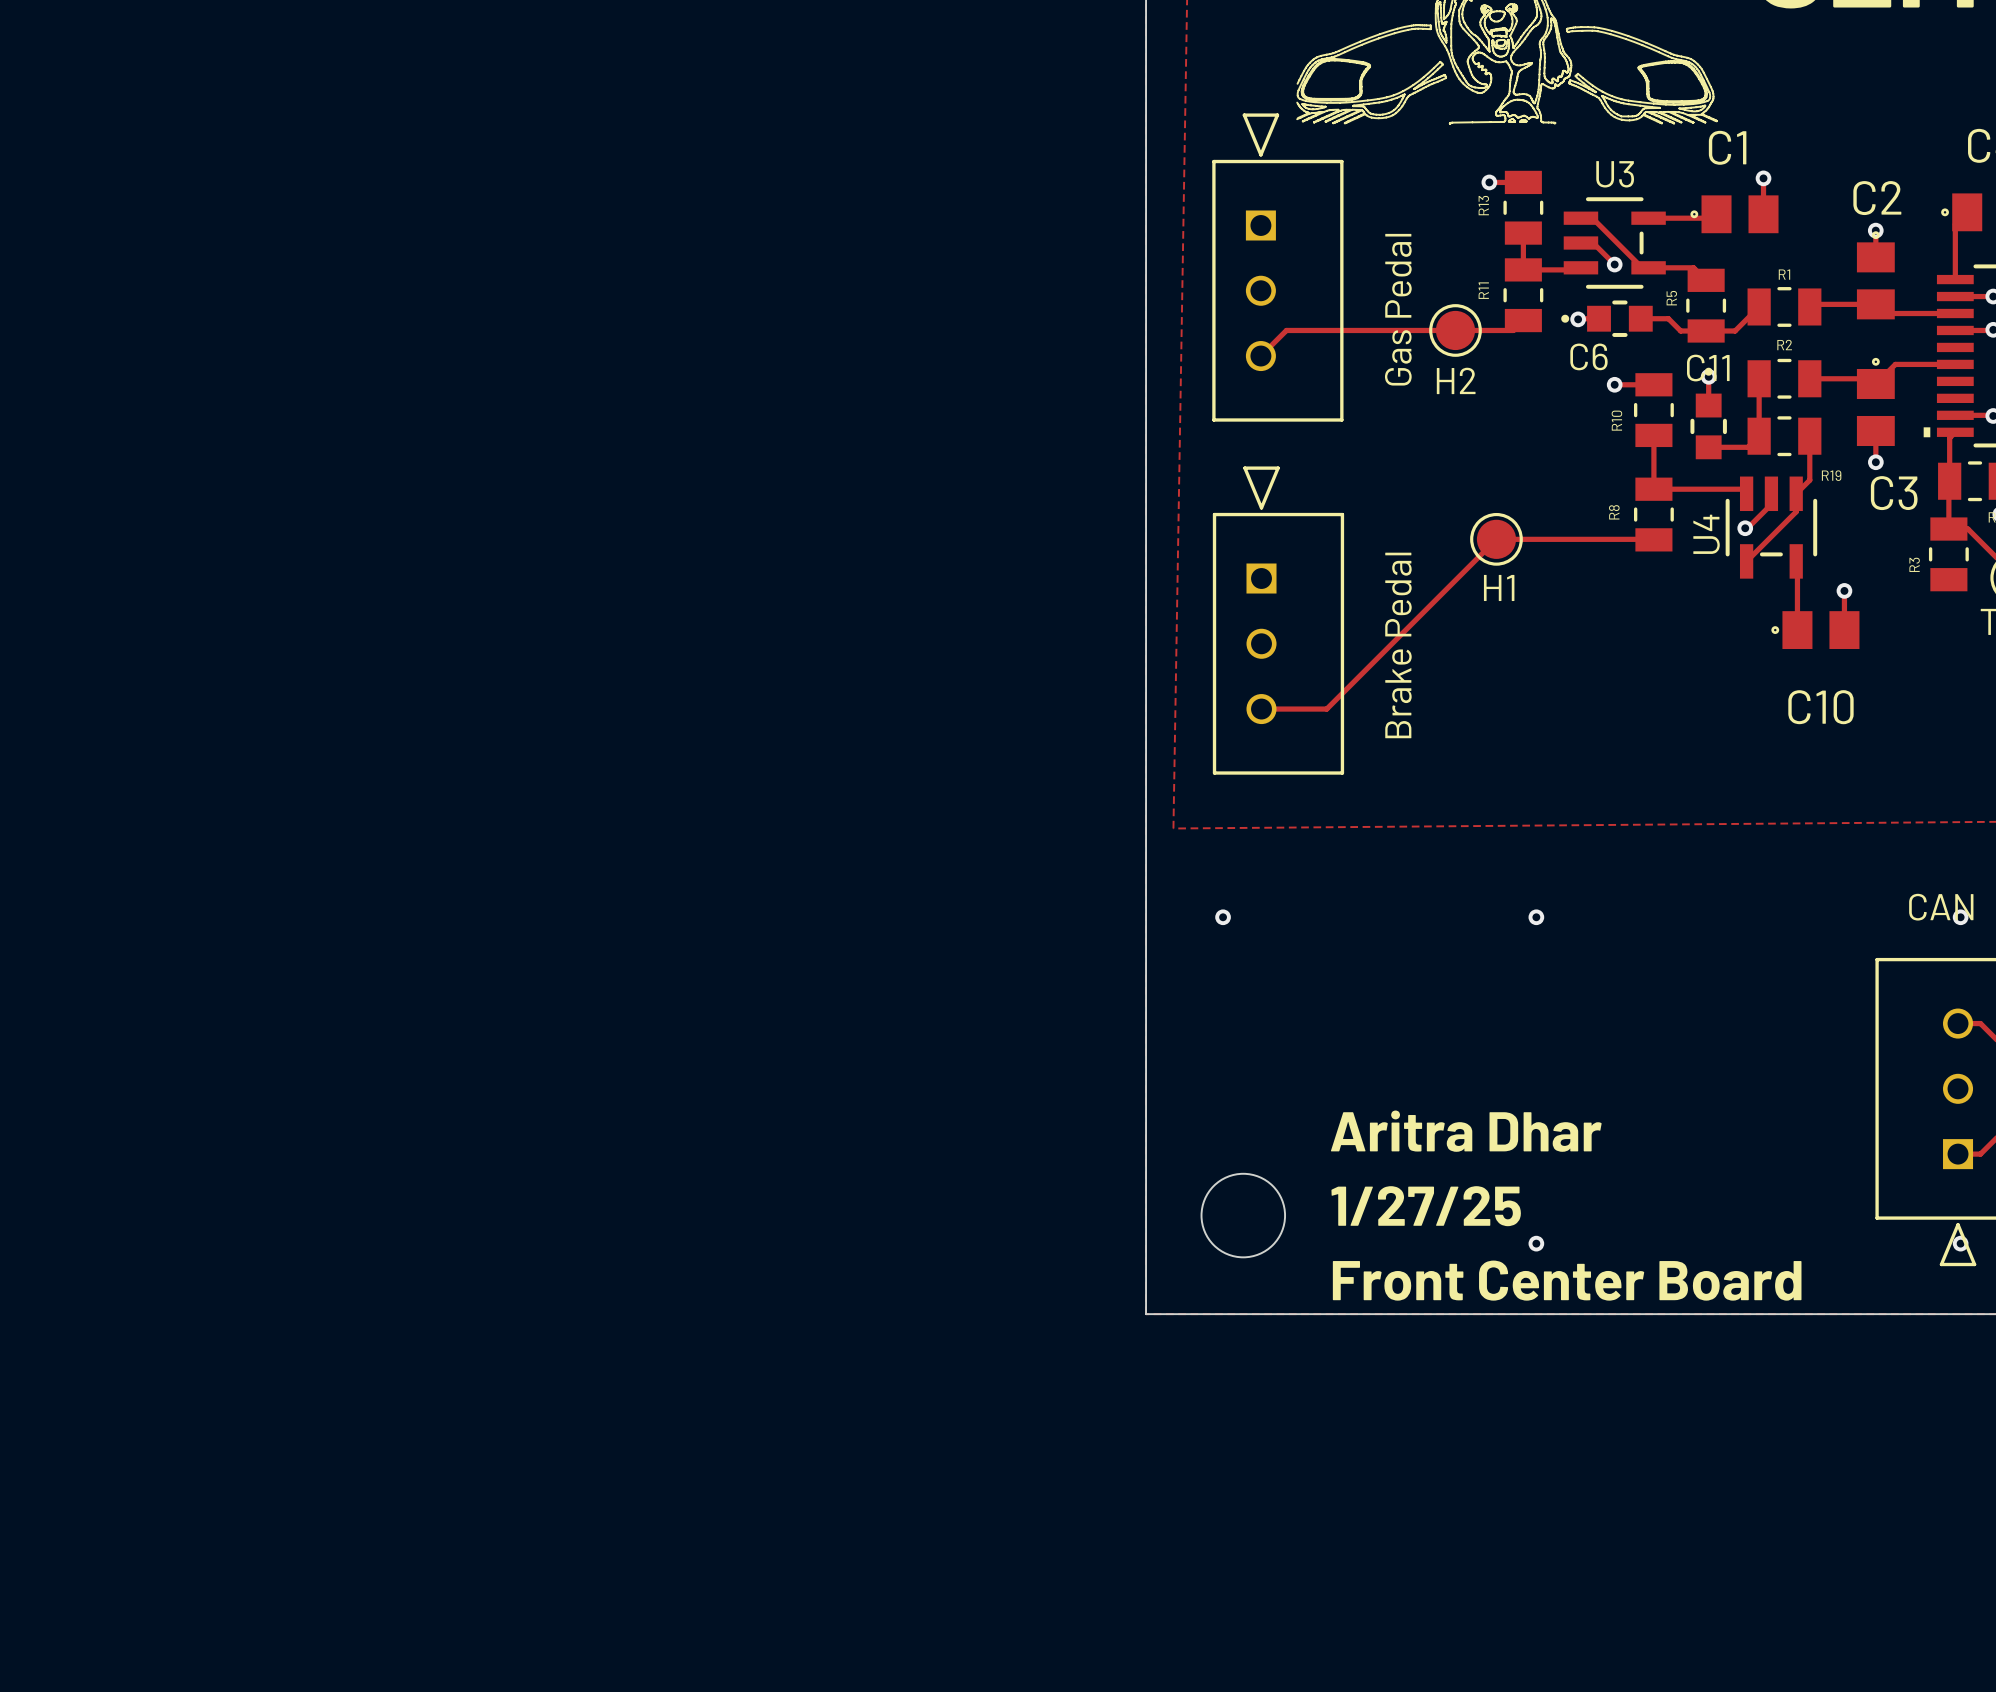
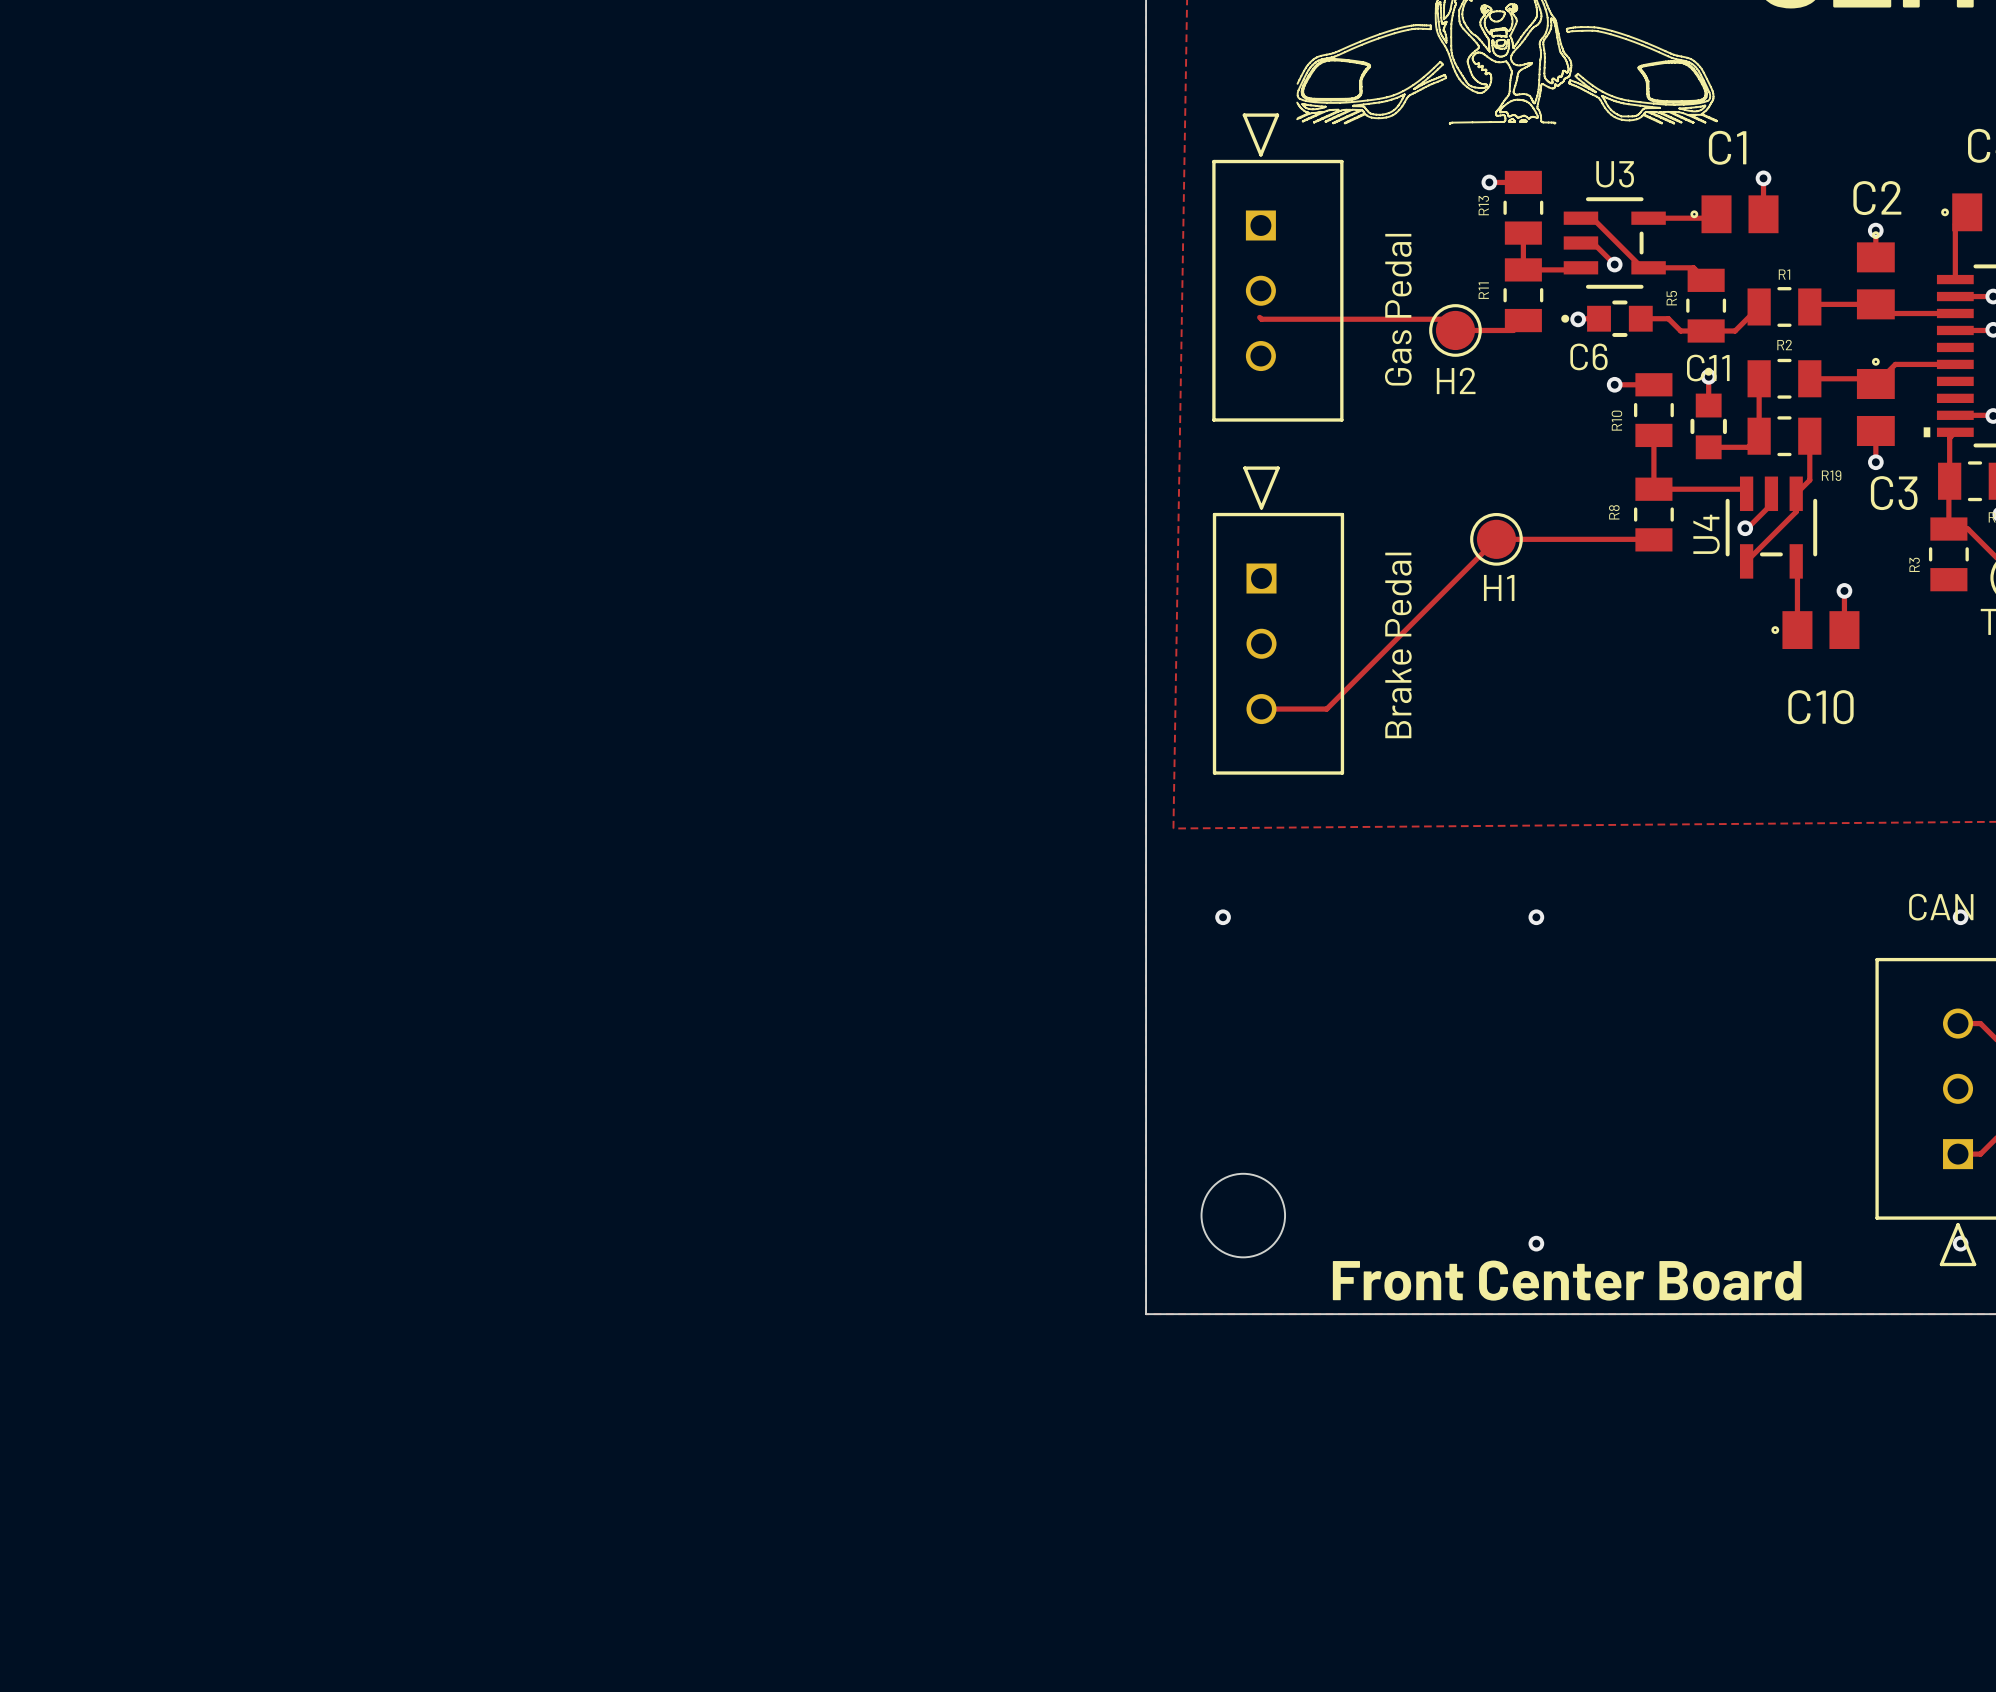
track: (1455, 330) (1286, 330) (1260, 356) -> (1455, 330) (1444, 319) (1261, 319) (1259, 317)
text: Aritra Dhar (1466, 1131) -> none
text: 1/27/25 (1426, 1206) -> none

